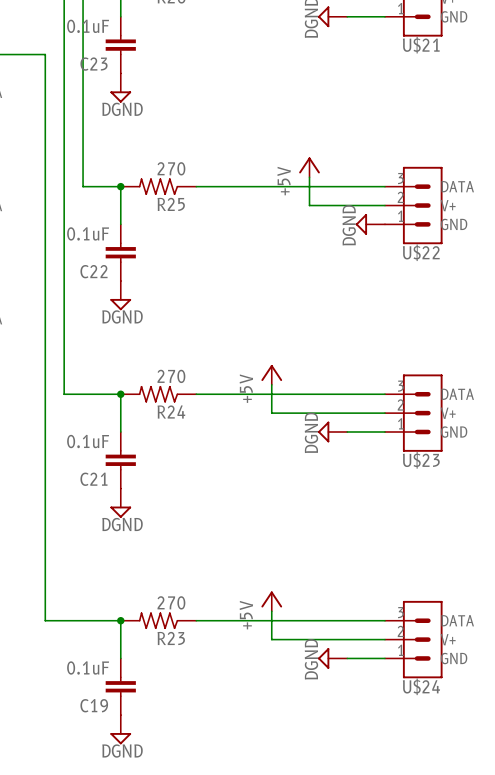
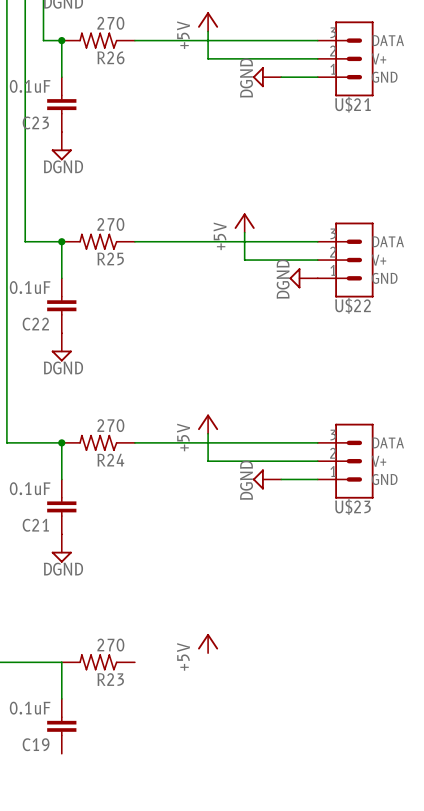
wire: (271, 611) (271, 639) (384, 639) -> none
junction: (120, 620) -> none
wire: (196, 620) (384, 620) -> none
U$24: (413, 639) -> none
power symbol: DGND (332, 658) -> none
wire: (347, 658) (384, 658) -> none
power symbol: DGND (120, 729) -> none

